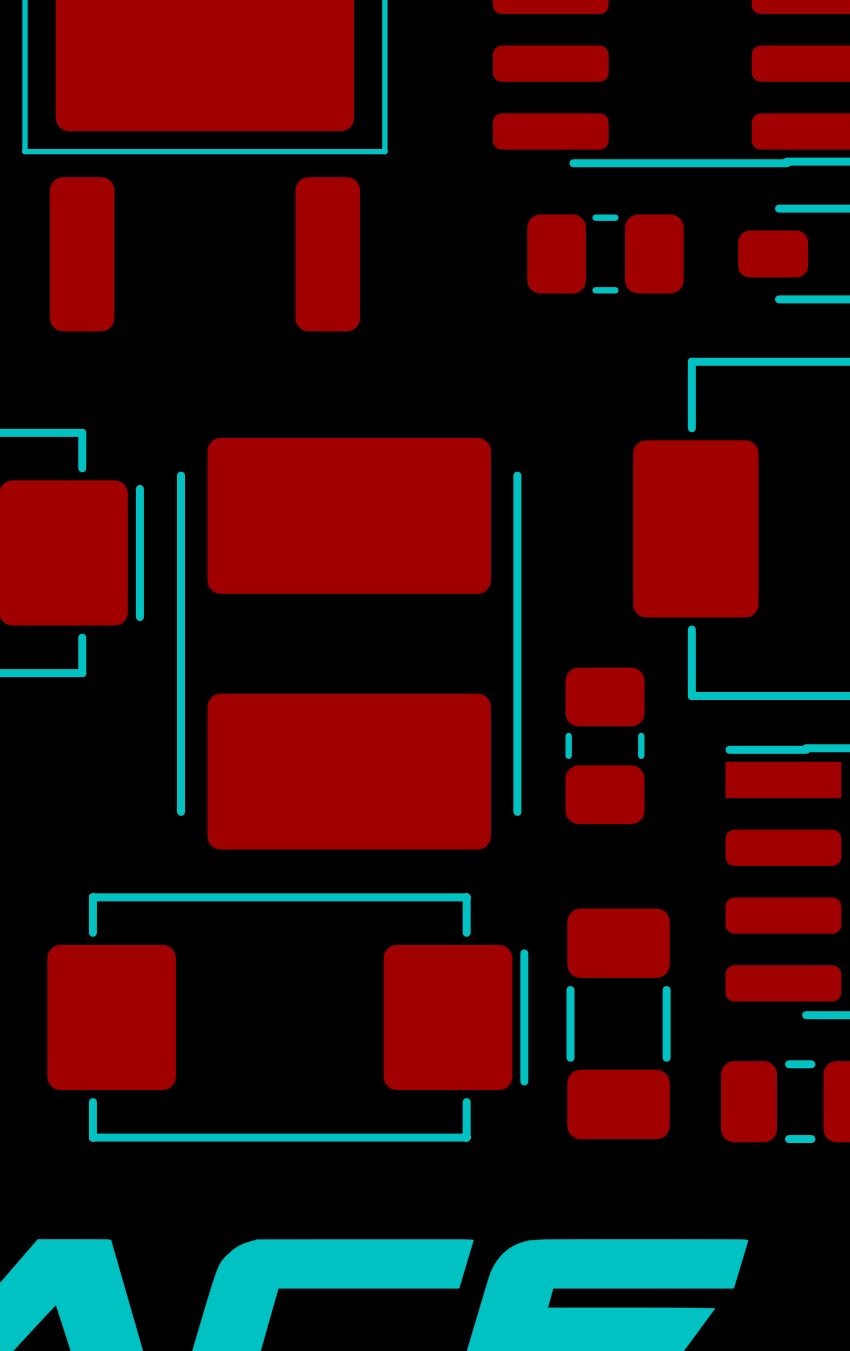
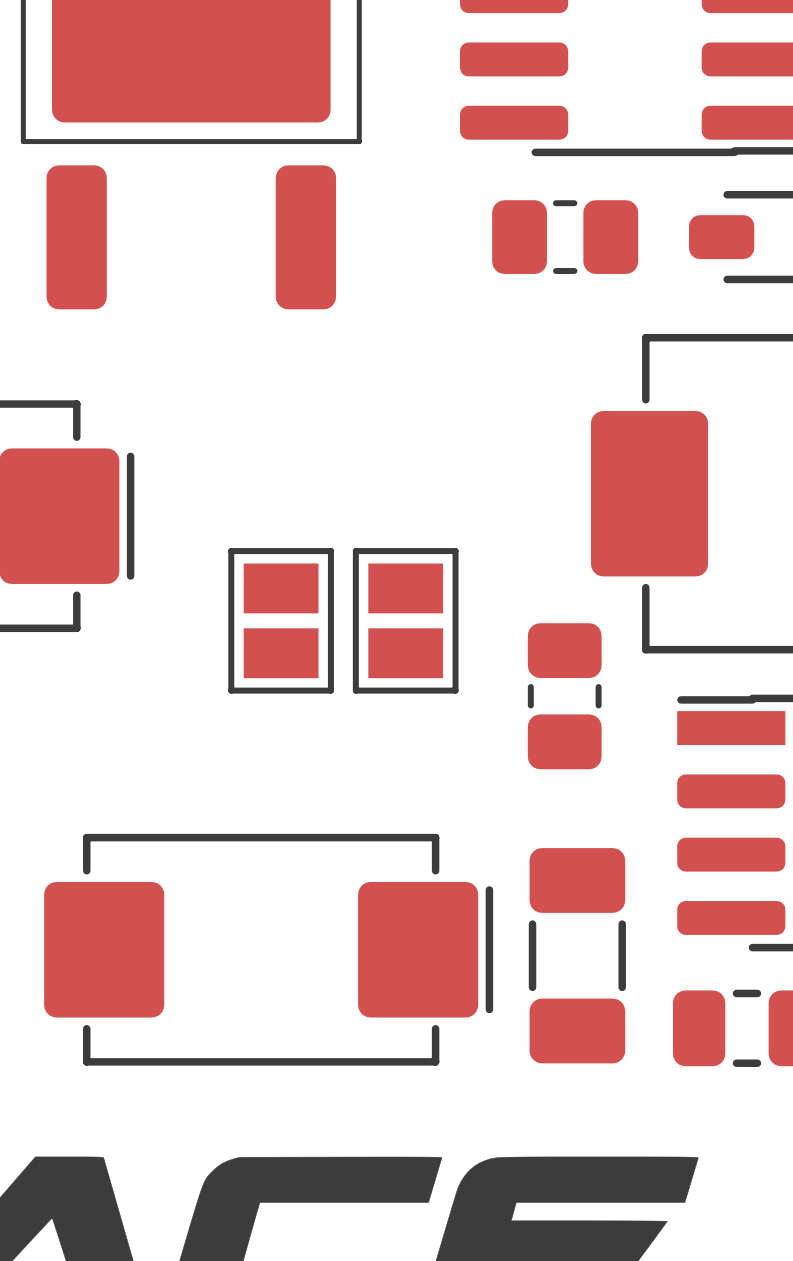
part: (349, 643) -> none
part: none -> (281, 620)
part: none -> (405, 620)

